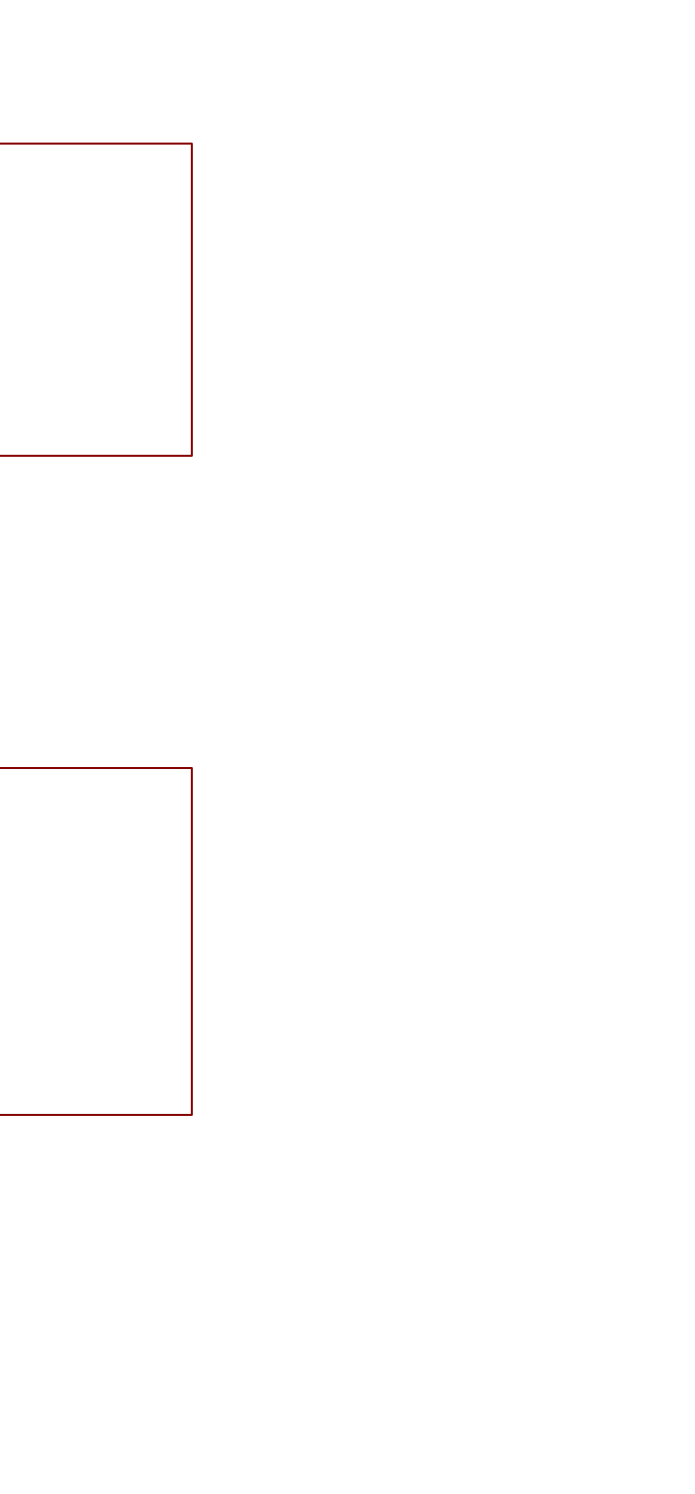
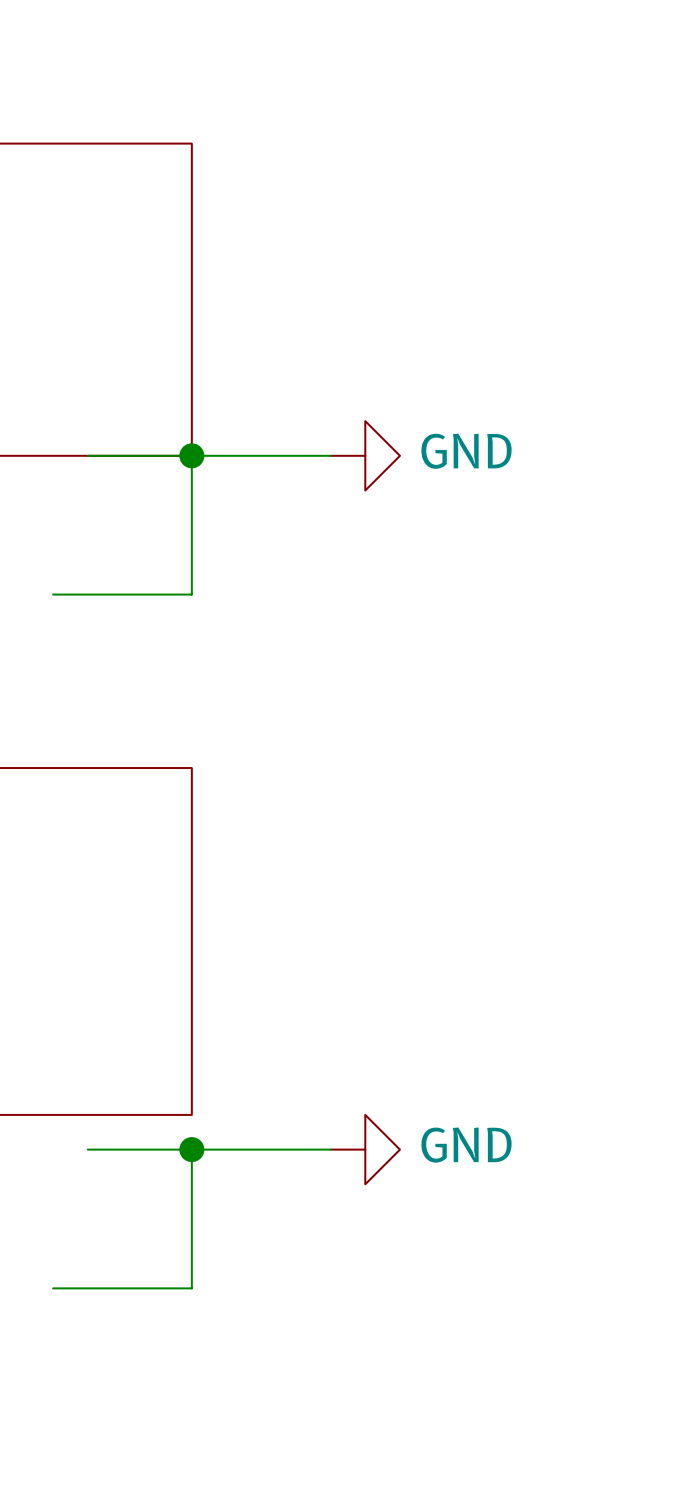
wire: none -> (87, 455) (330, 455)
wire: none -> (191, 455) (191, 594) (53, 594)
junction: none -> (191, 455)
power symbol: none -> GND (365, 455)
wire: none -> (87, 1149) (330, 1149)
wire: none -> (191, 1149) (191, 1288) (53, 1288)
junction: none -> (191, 1149)
power symbol: none -> GND (365, 1149)

